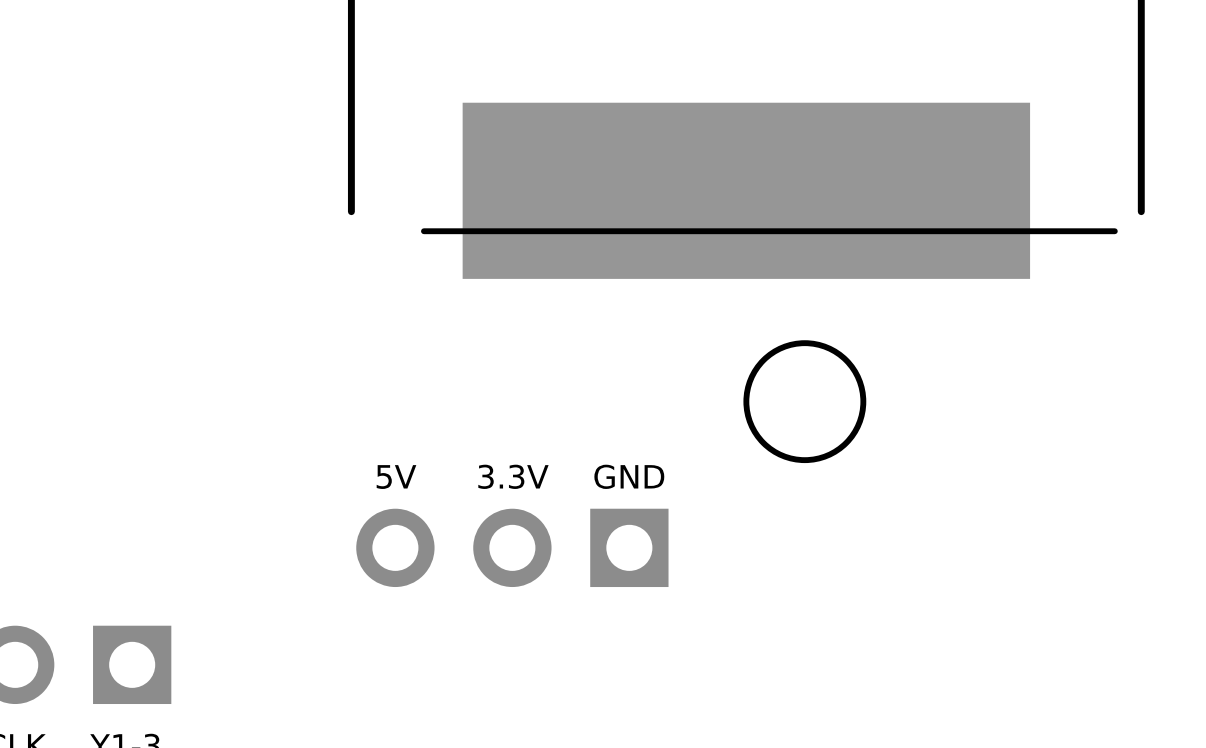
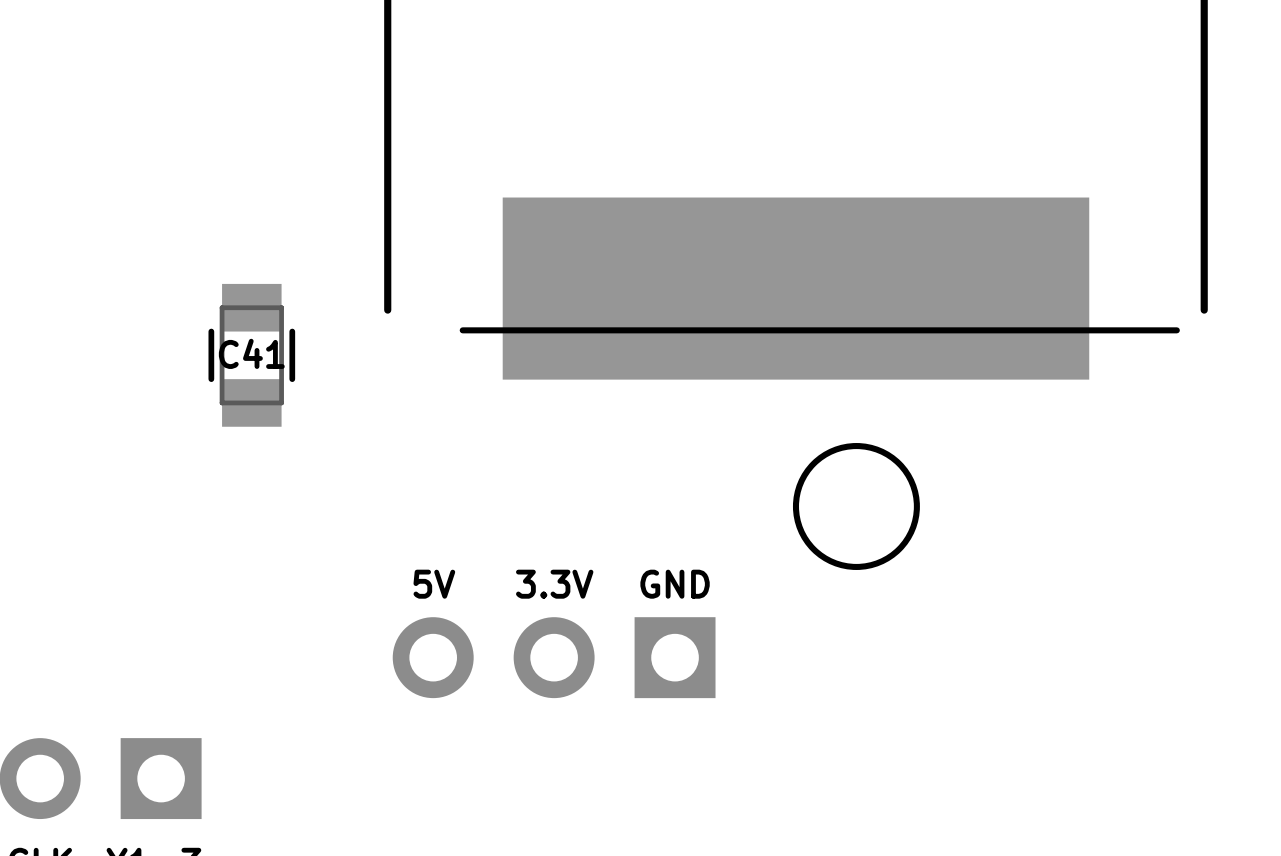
C41: none -> (251, 355)

